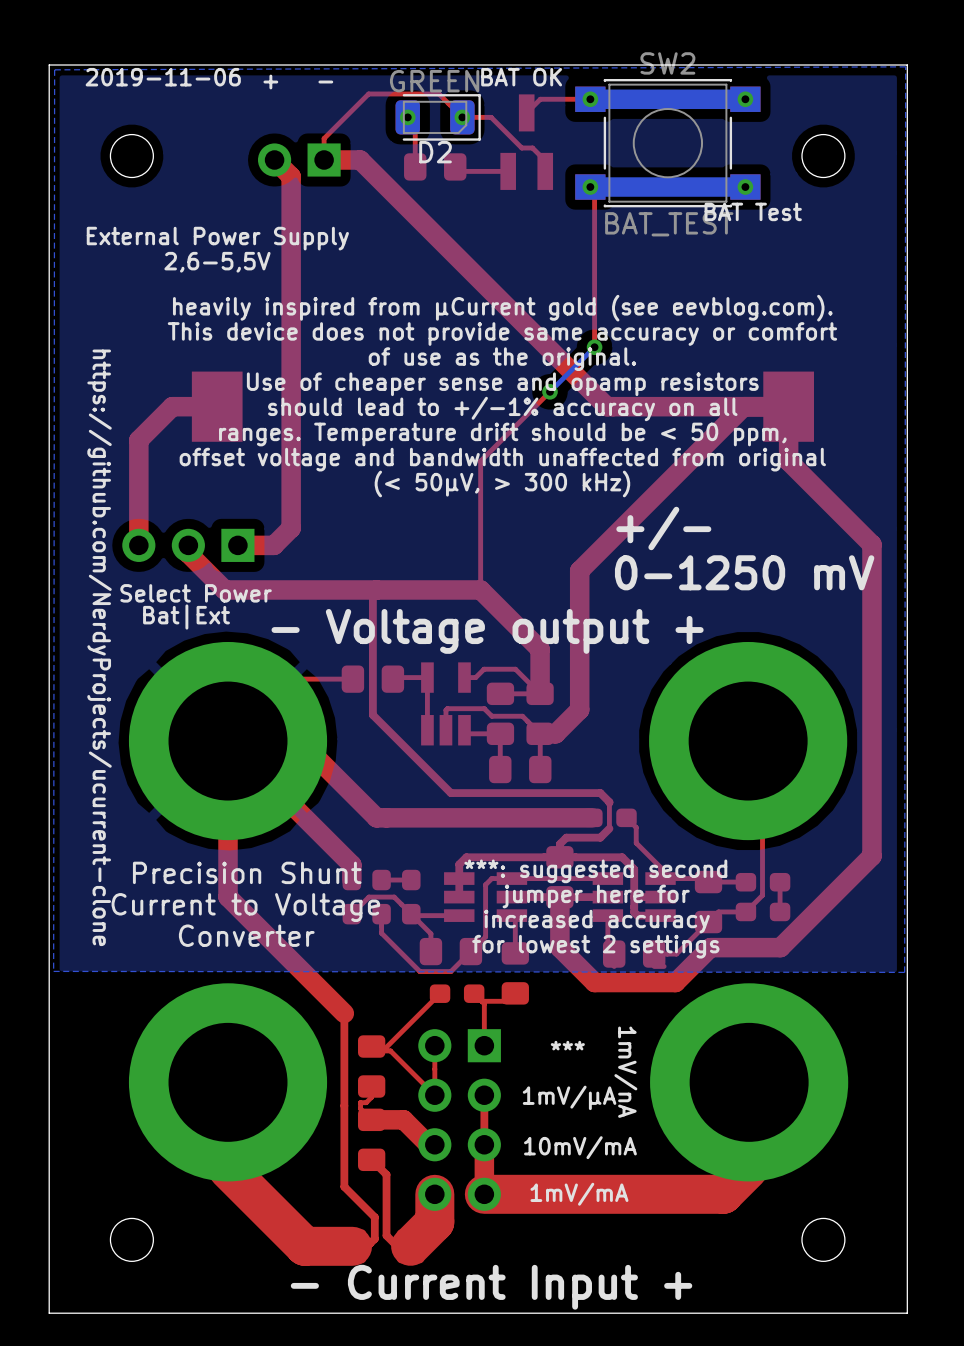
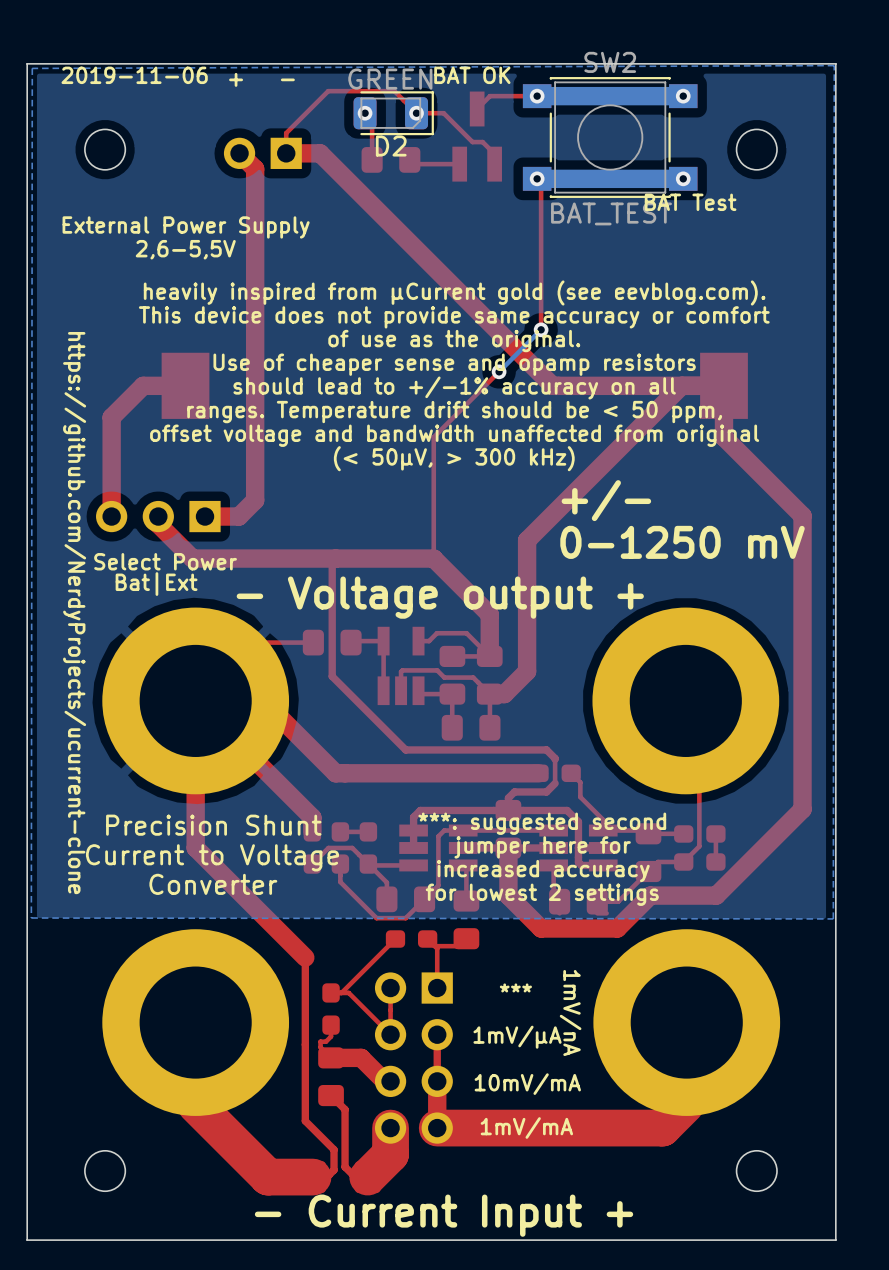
part footprint: [358, 1035, 386, 1098] -> [322, 983, 340, 1035]

